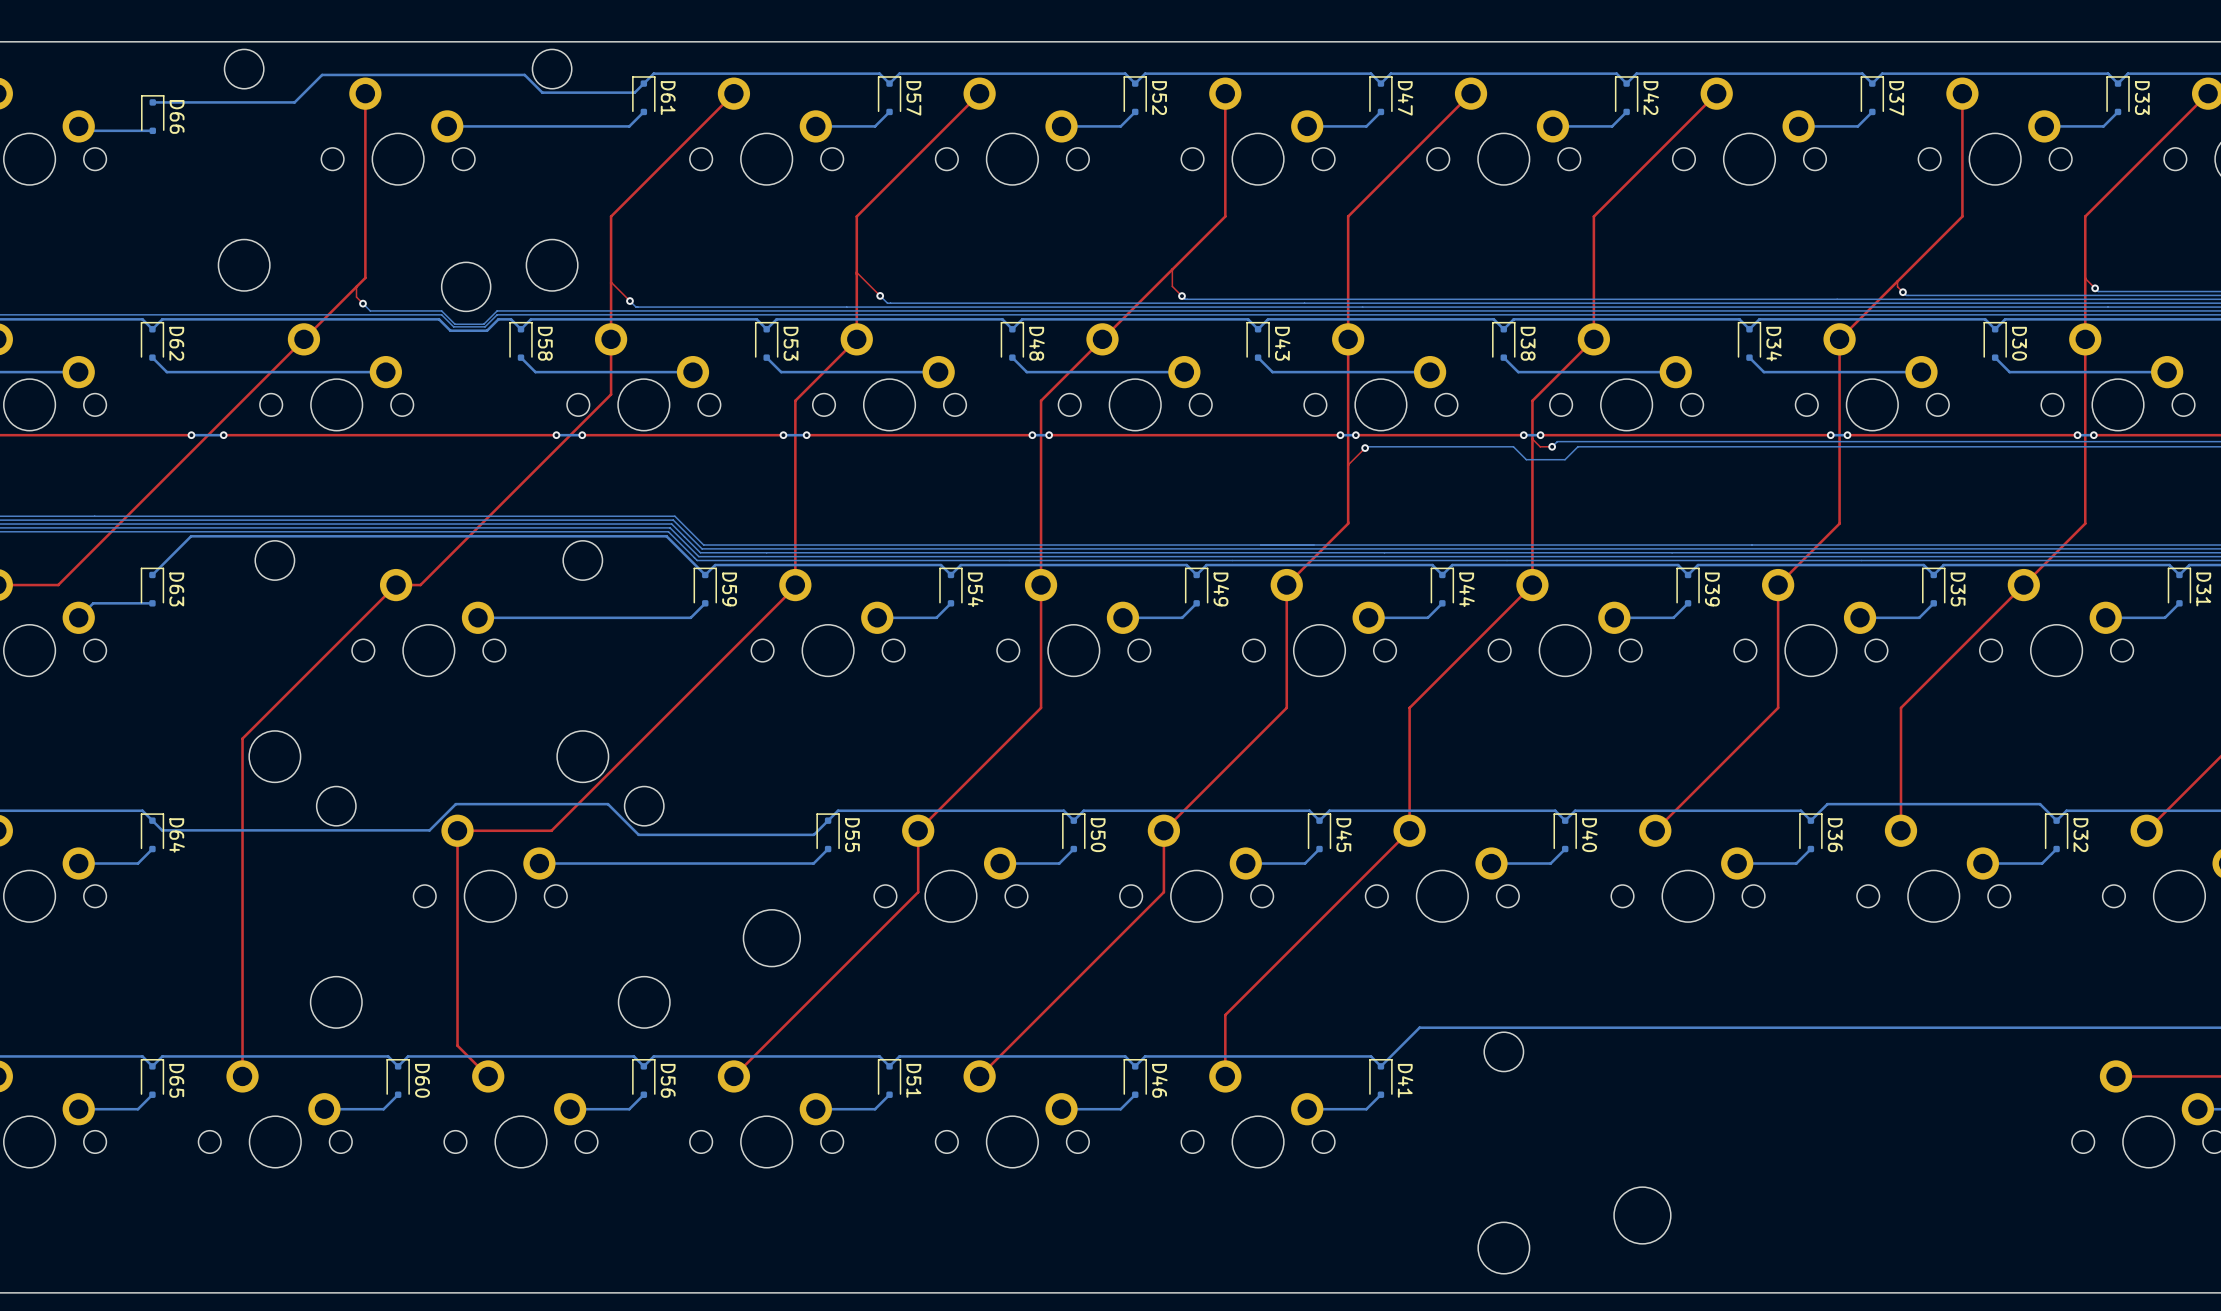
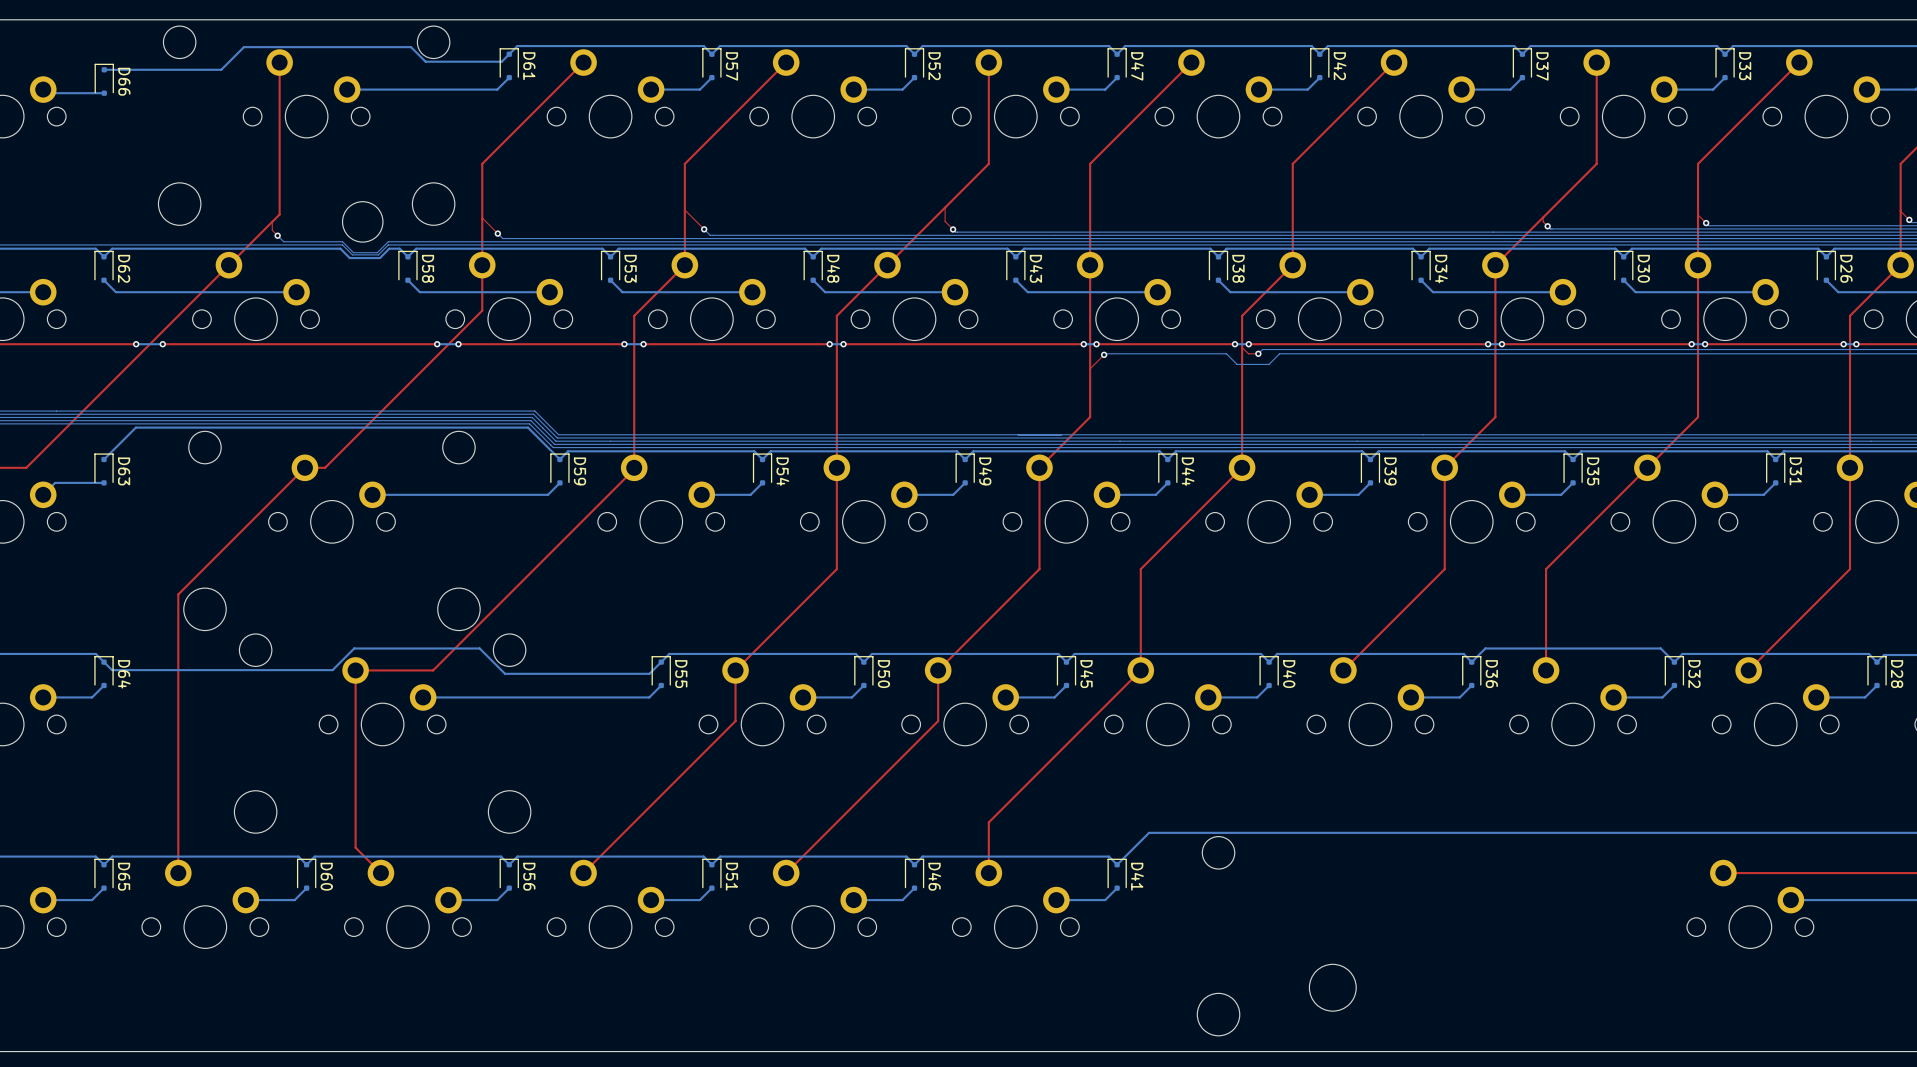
round board edge: [743, 909, 801, 967] -> none

